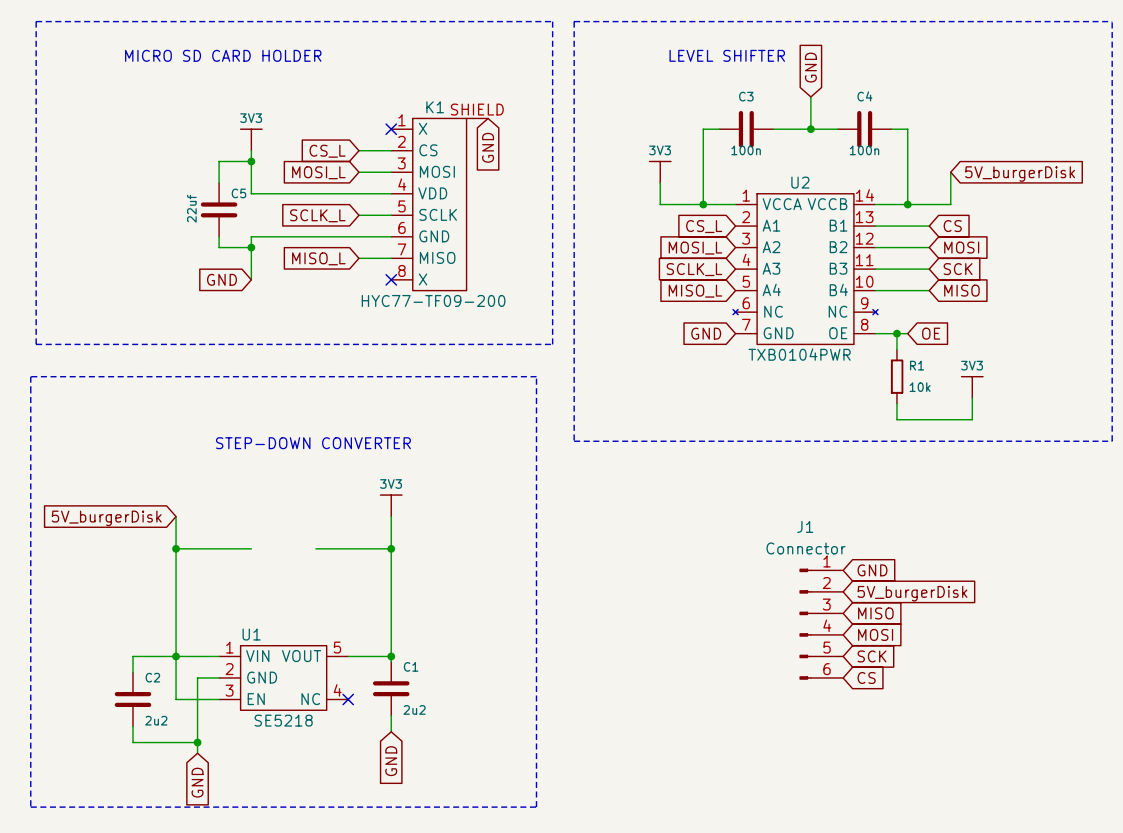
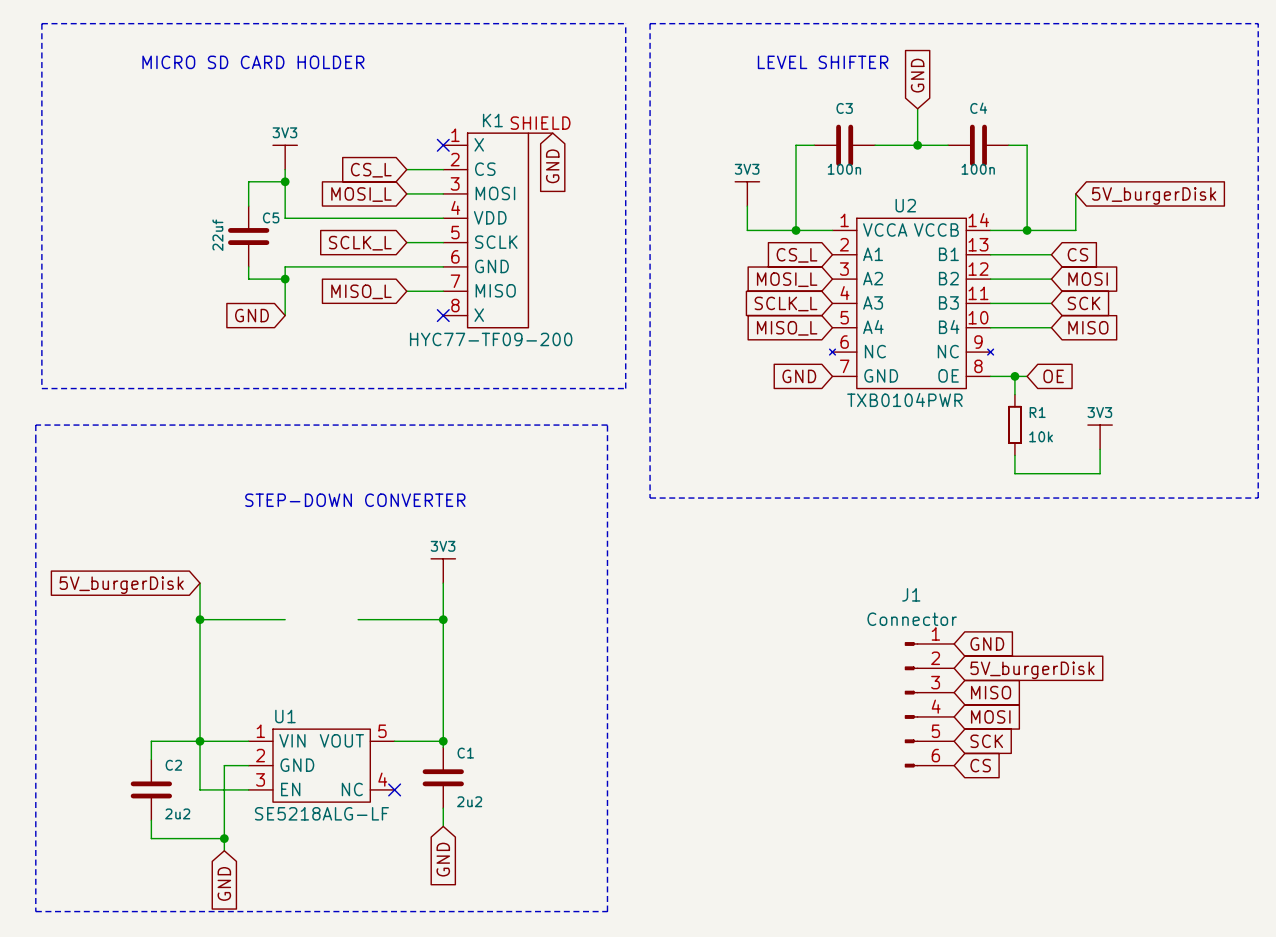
U1 value: SE5218 (283, 720) -> SE5218ALG-LF (321, 813)

